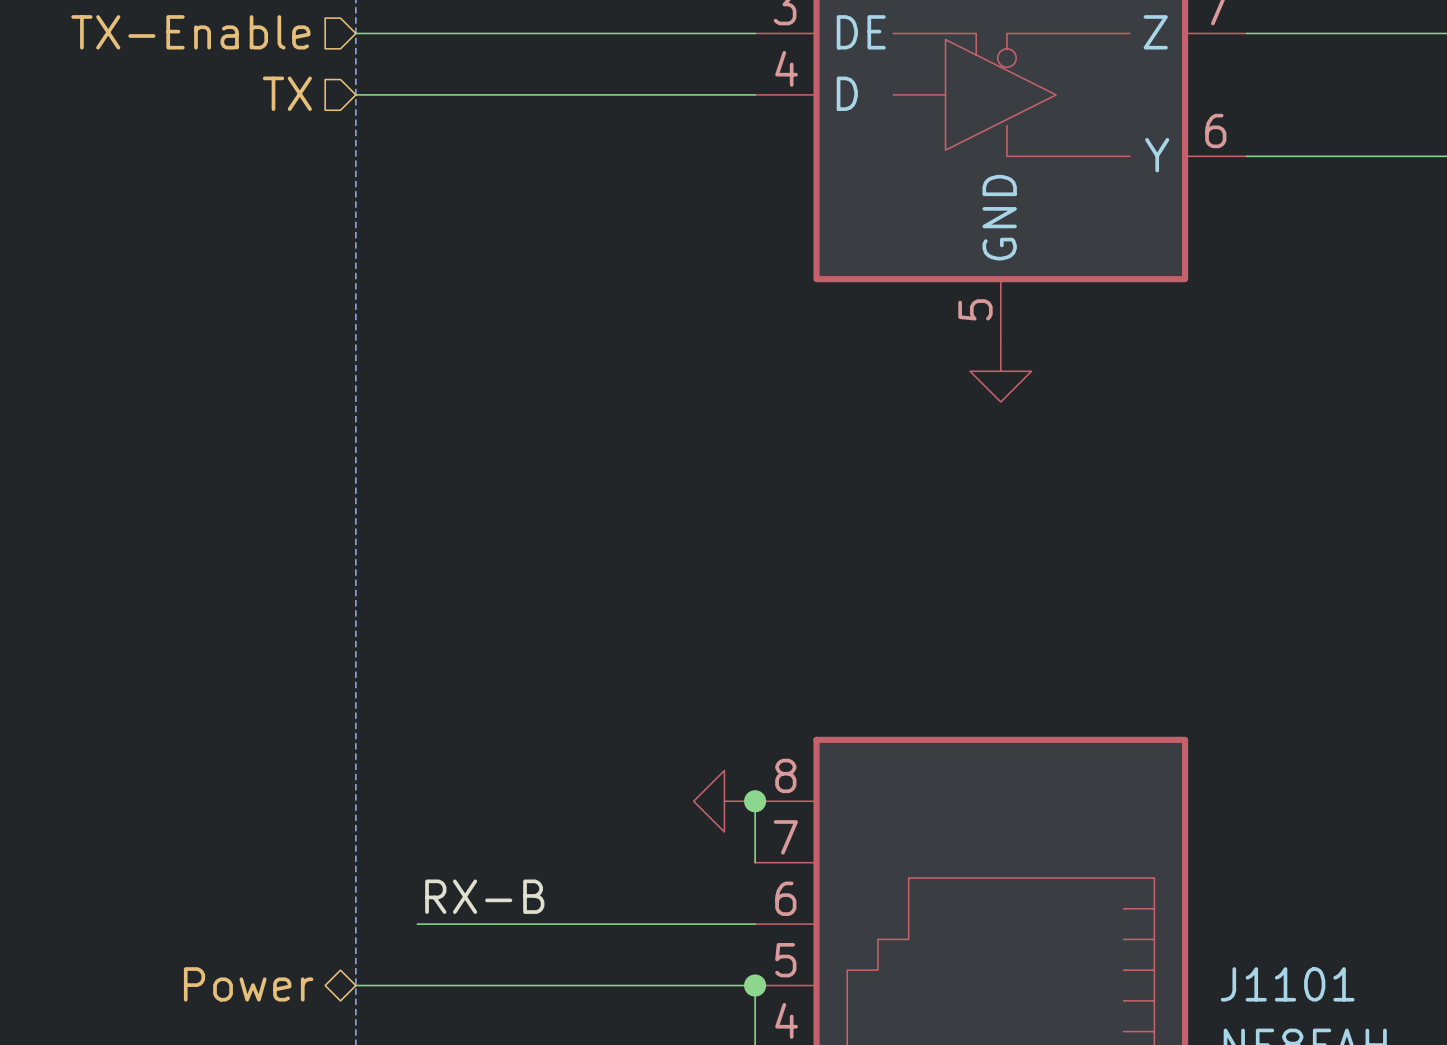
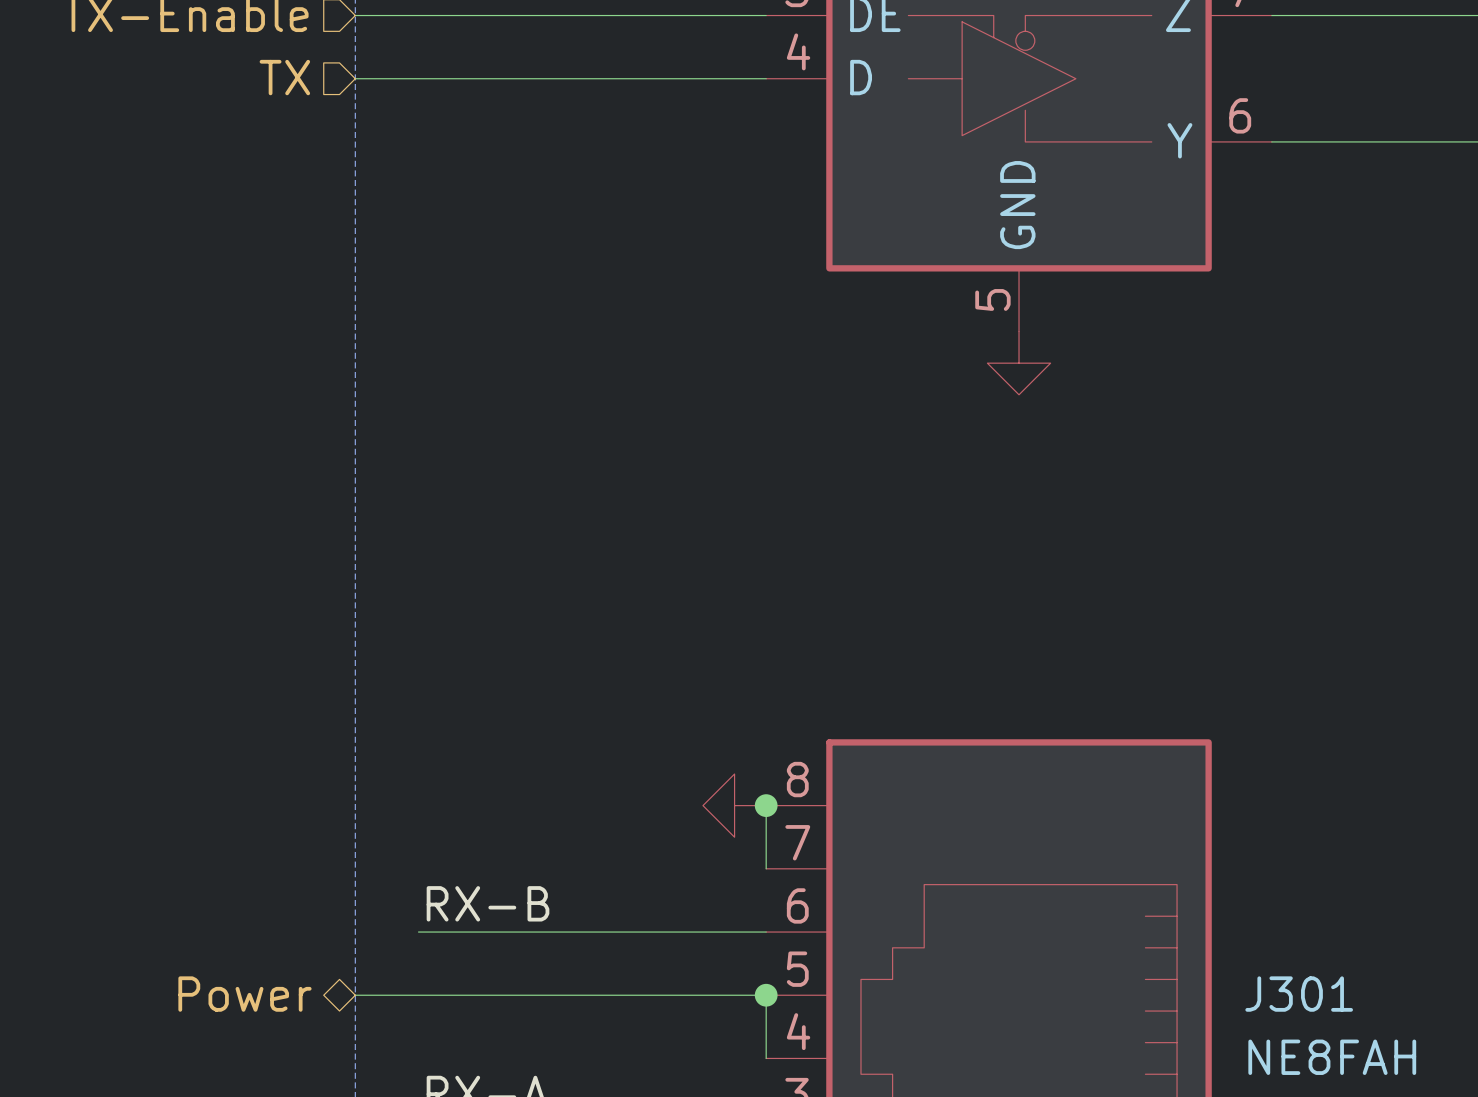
J1101 name: J1101 (1287, 984) -> J301 (1299, 994)

